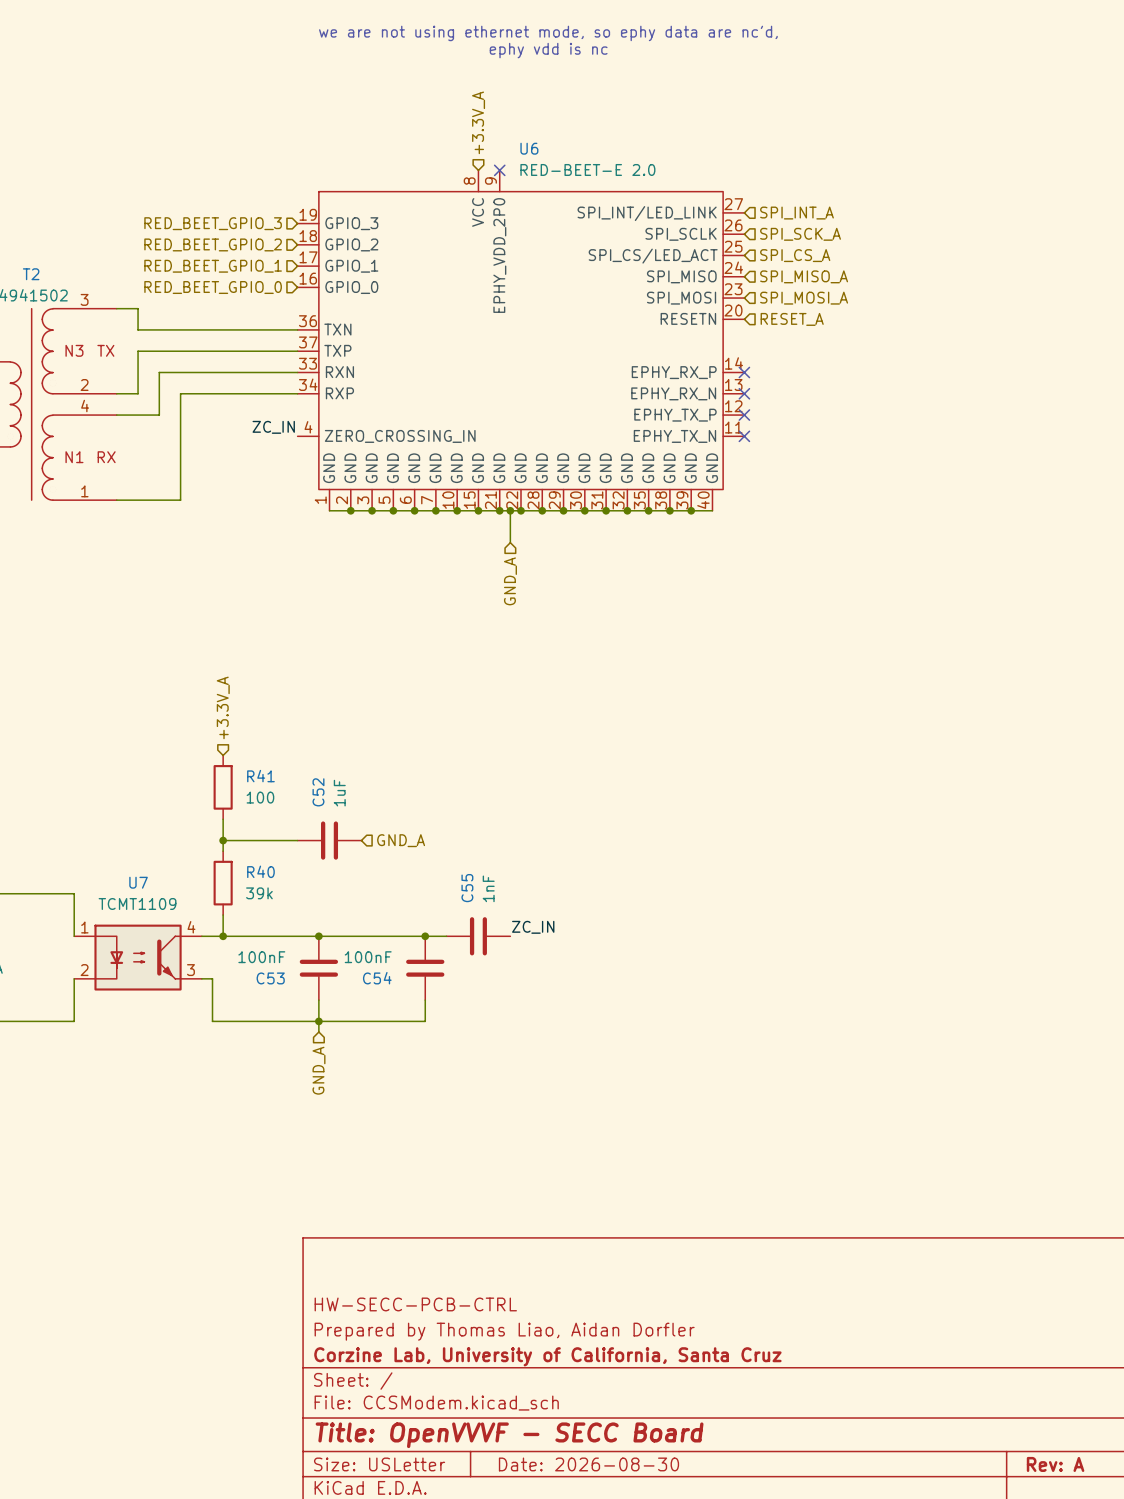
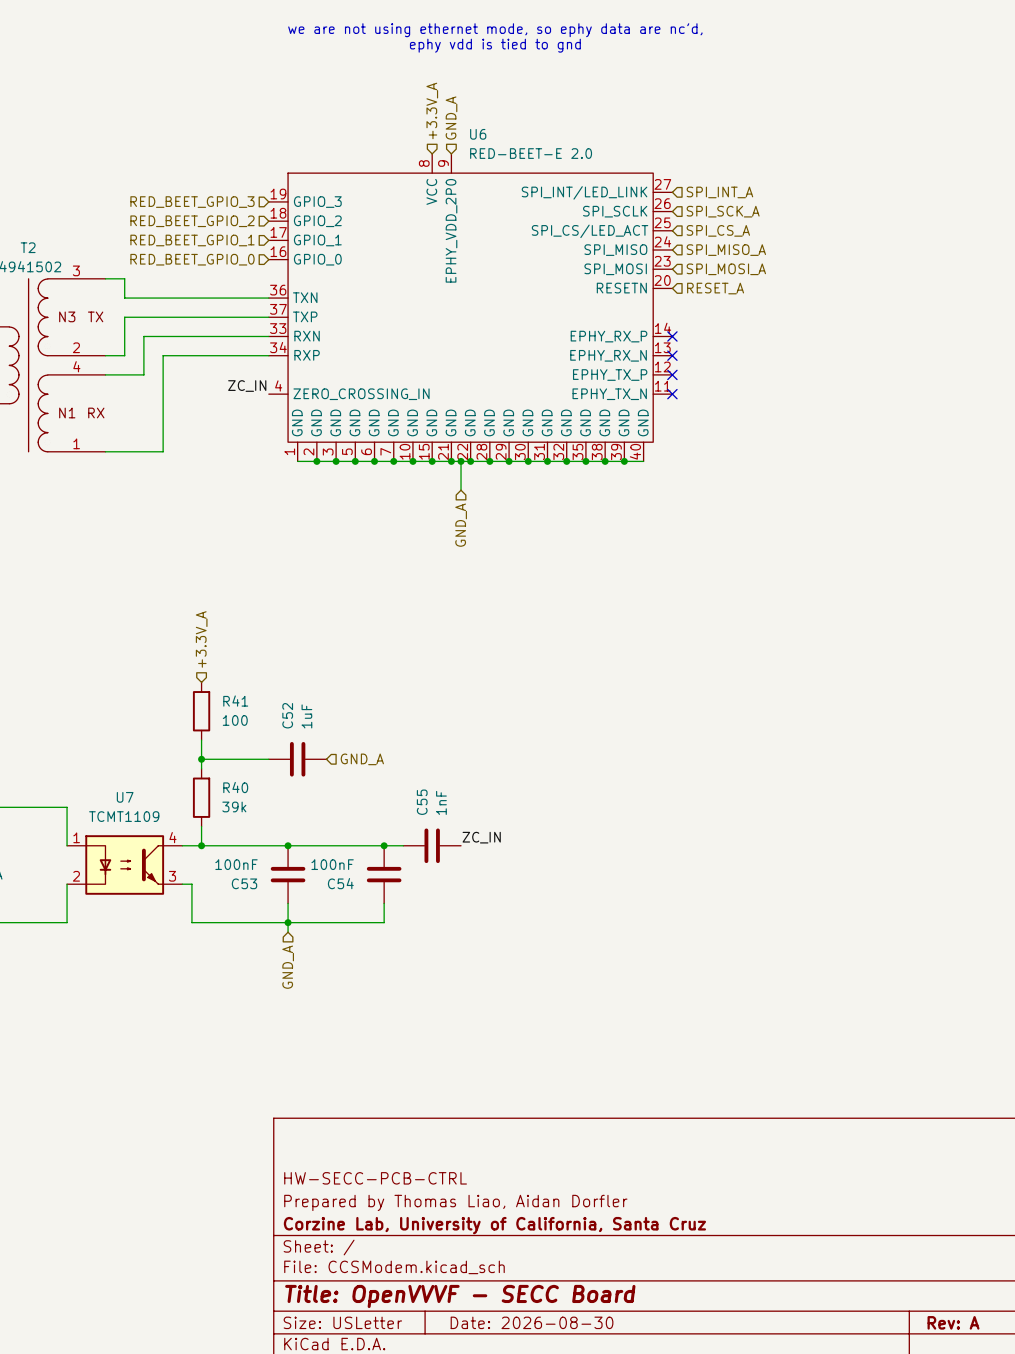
text: ephy vdd is nc (548, 50) -> ephy vdd is tied to gnd (495, 45)
hierarchical label: none -> GND_A (451, 118)
no-connect mark: (499, 170) -> none

